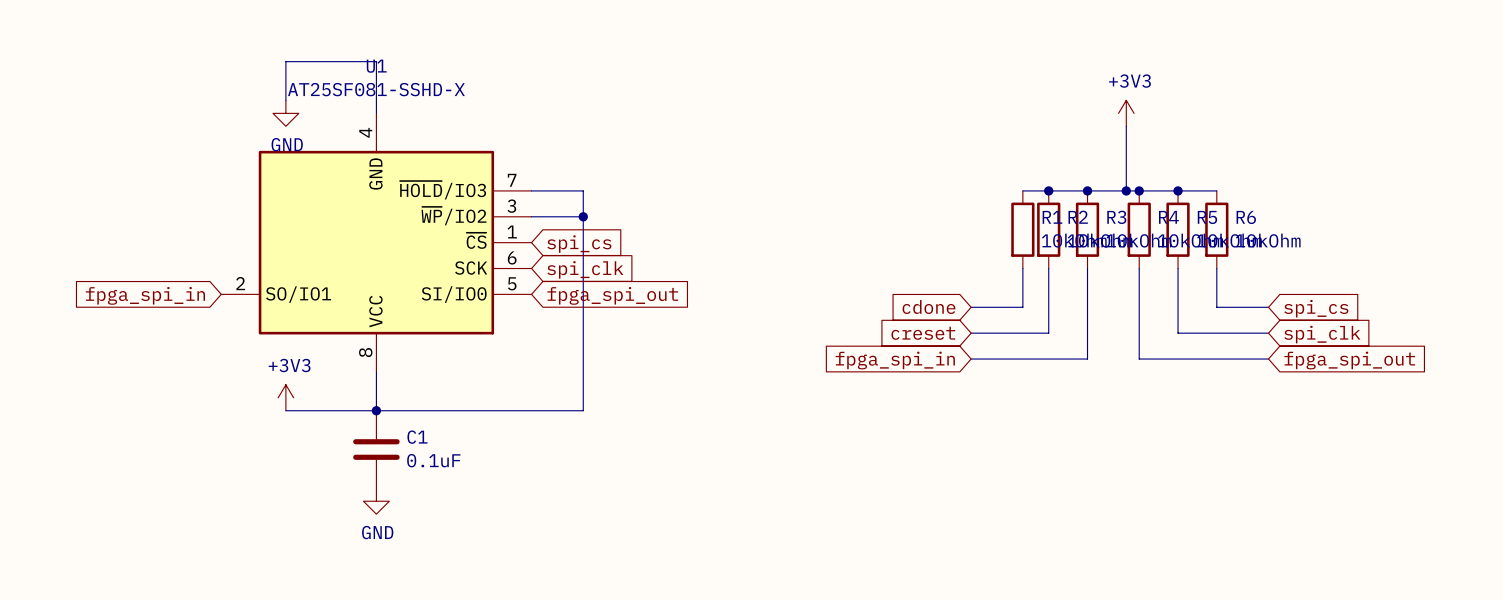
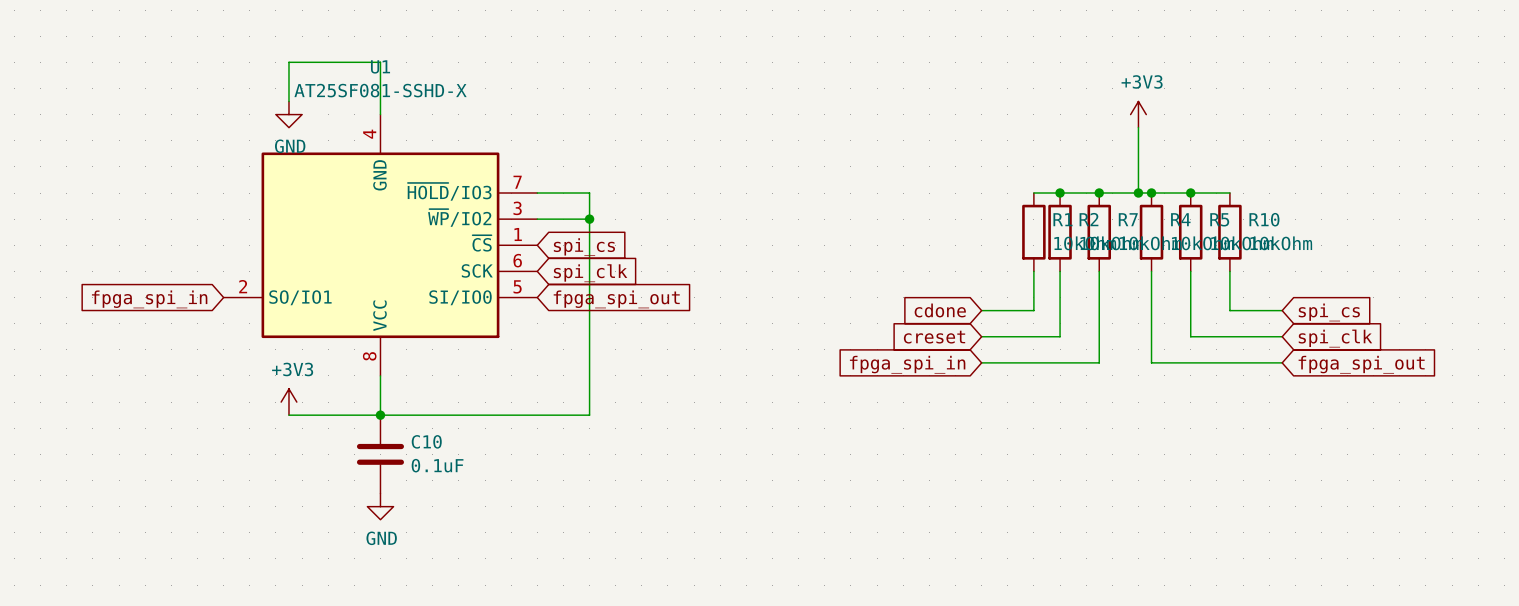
R3 name: R3 (1116, 217) -> R7 (1128, 219)
R6 name: R6 (1246, 217) -> R10 (1264, 219)
C1 name: C1 (417, 437) -> C10 (426, 441)

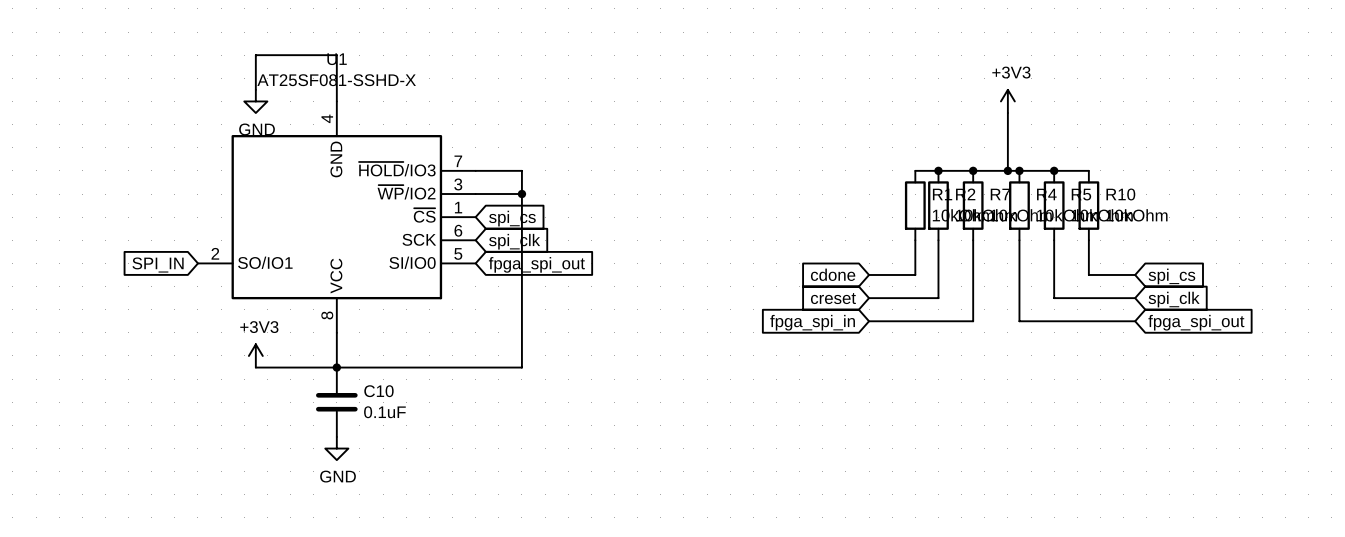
global label: fpga_spi_in (149, 299) -> SPI_IN (158, 265)

